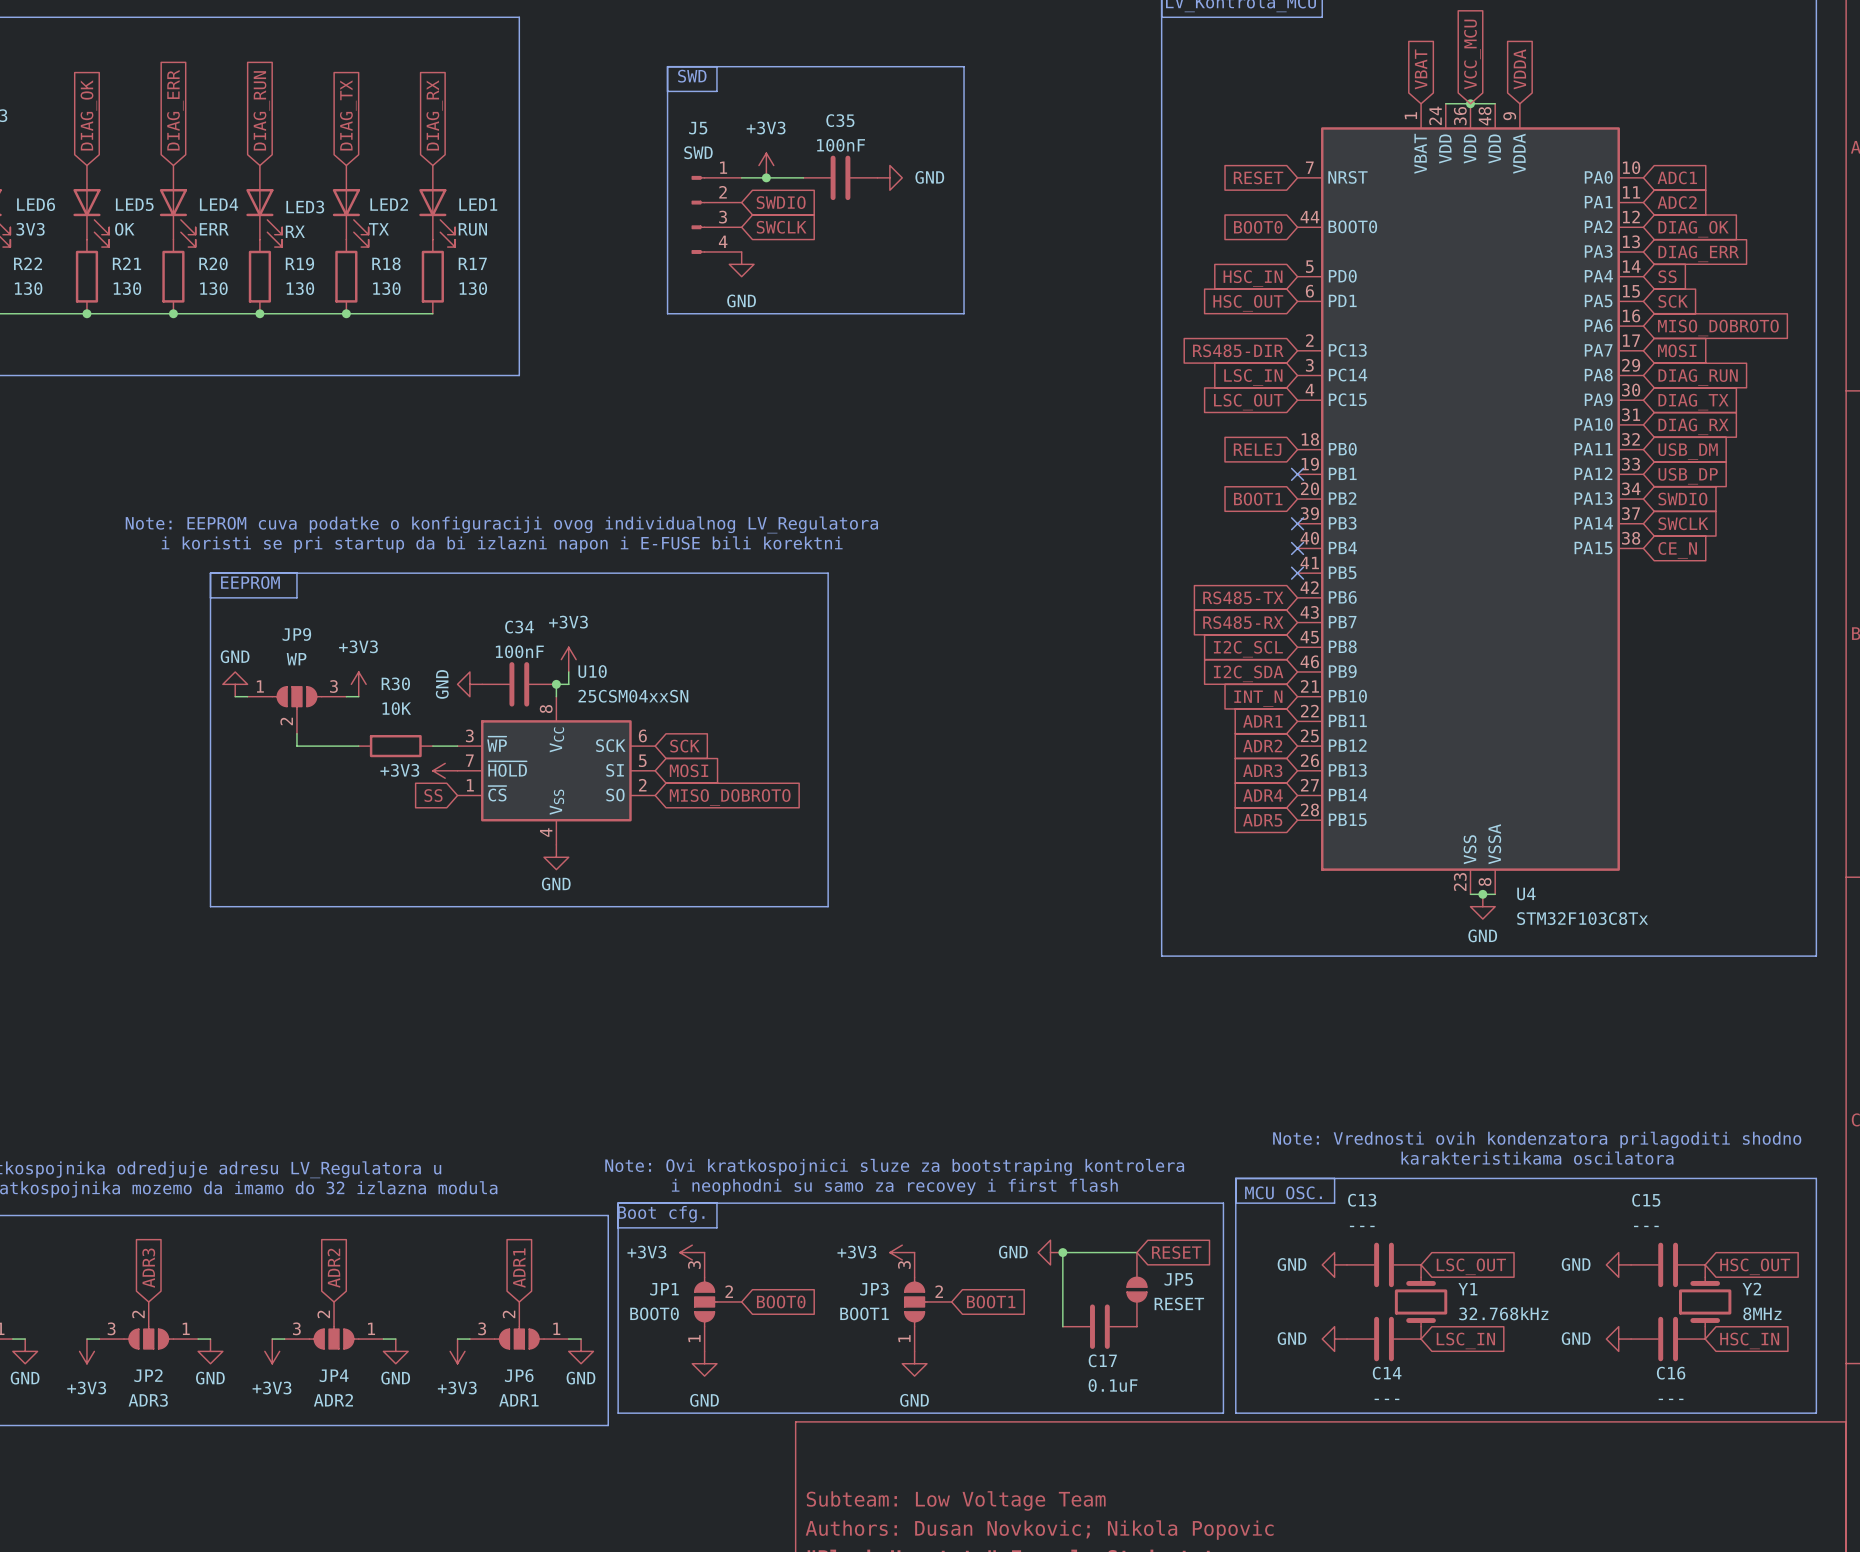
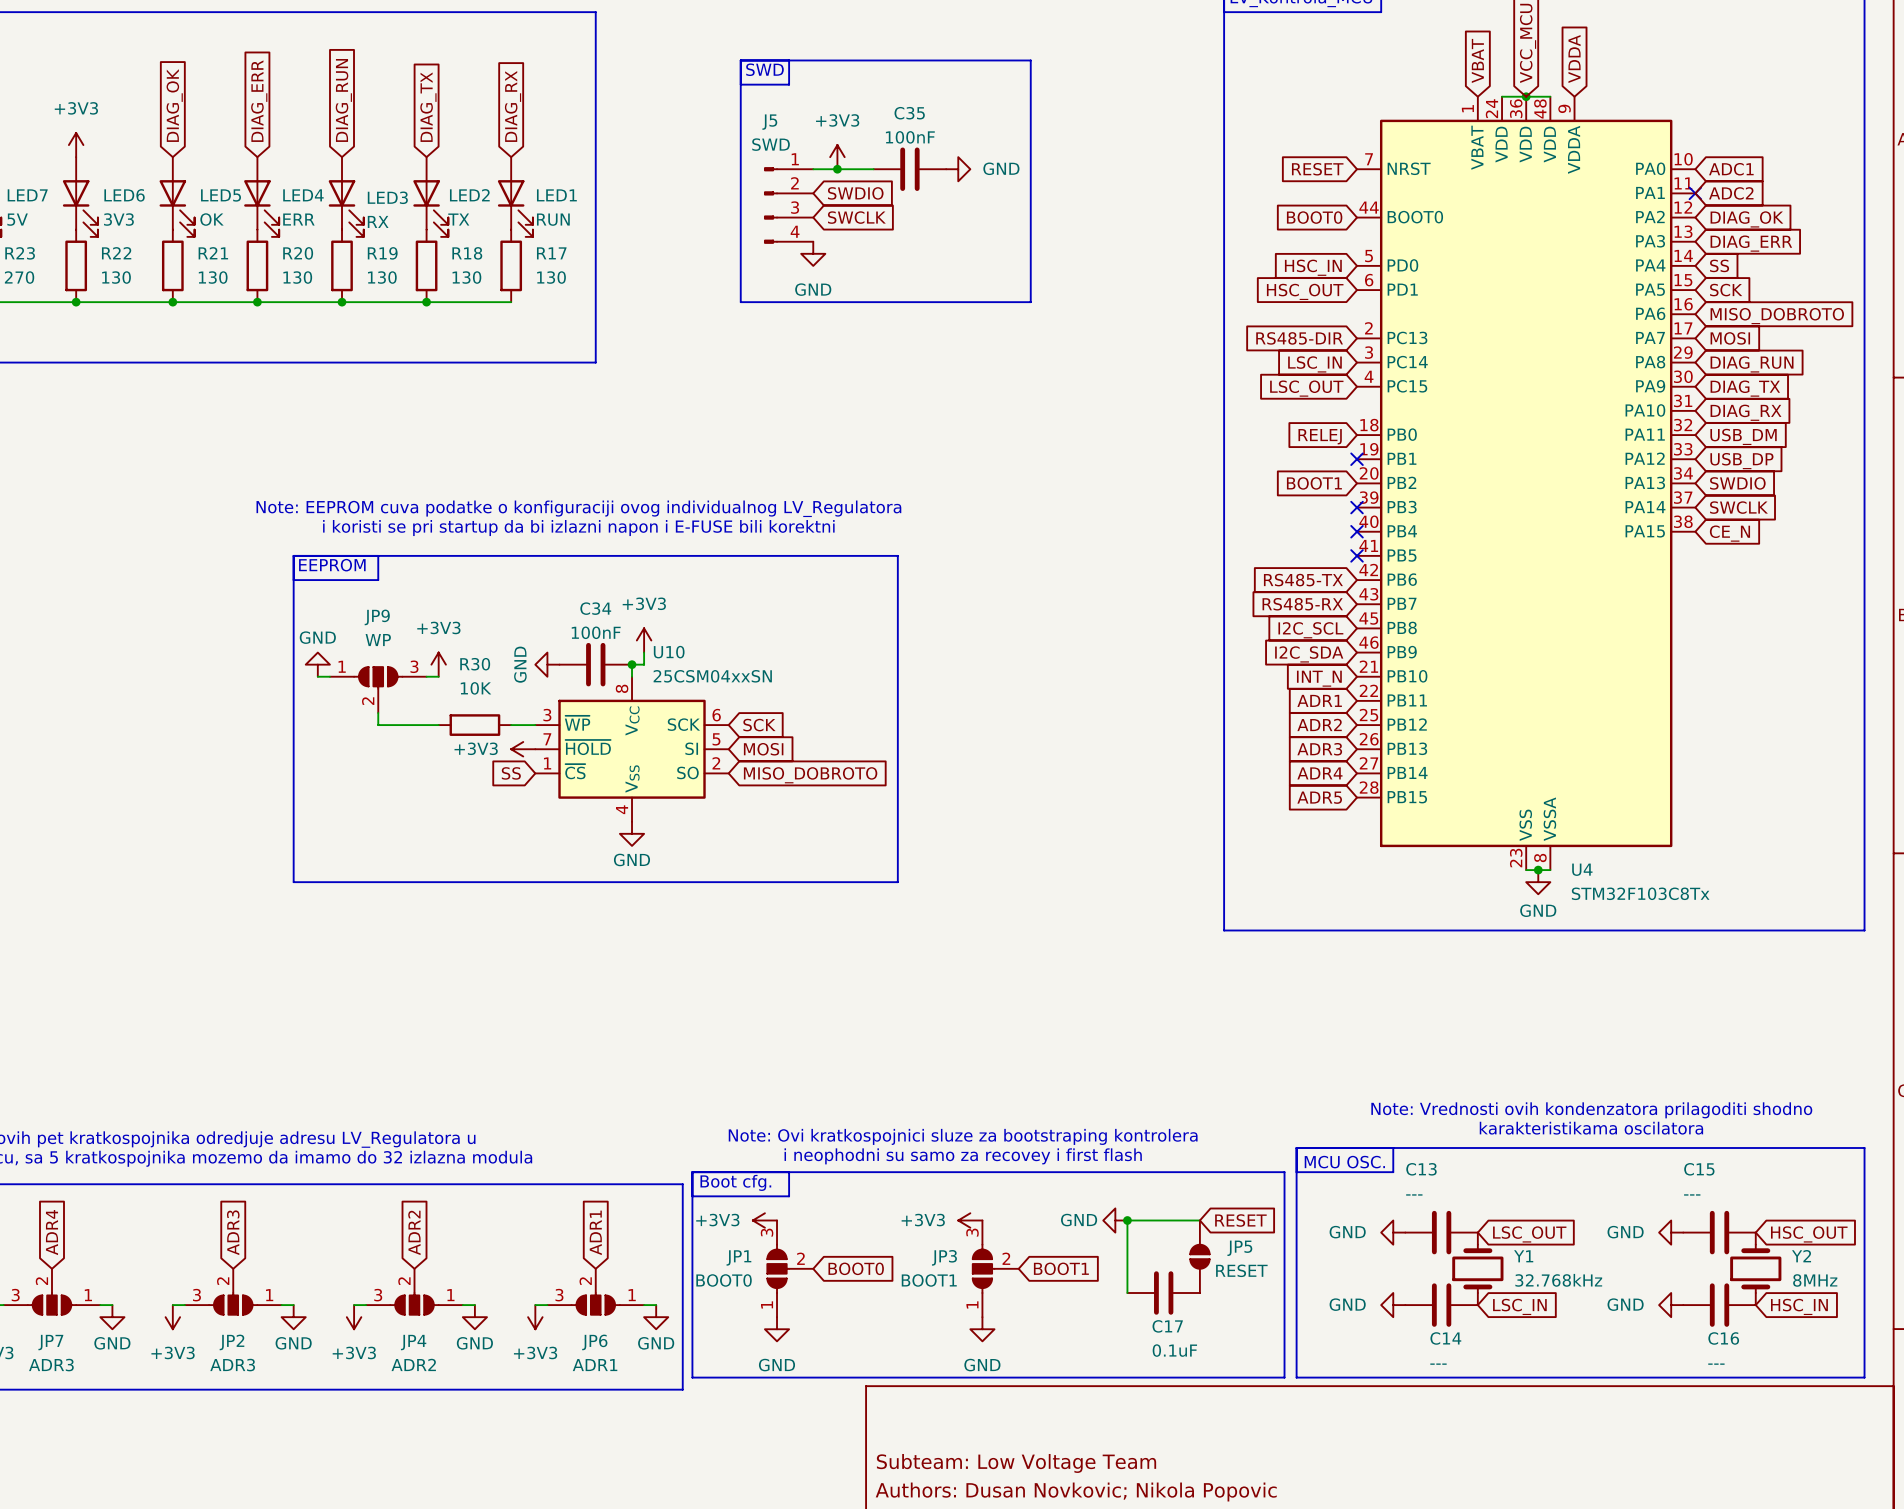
no-connect mark: none -> (1695, 193)

